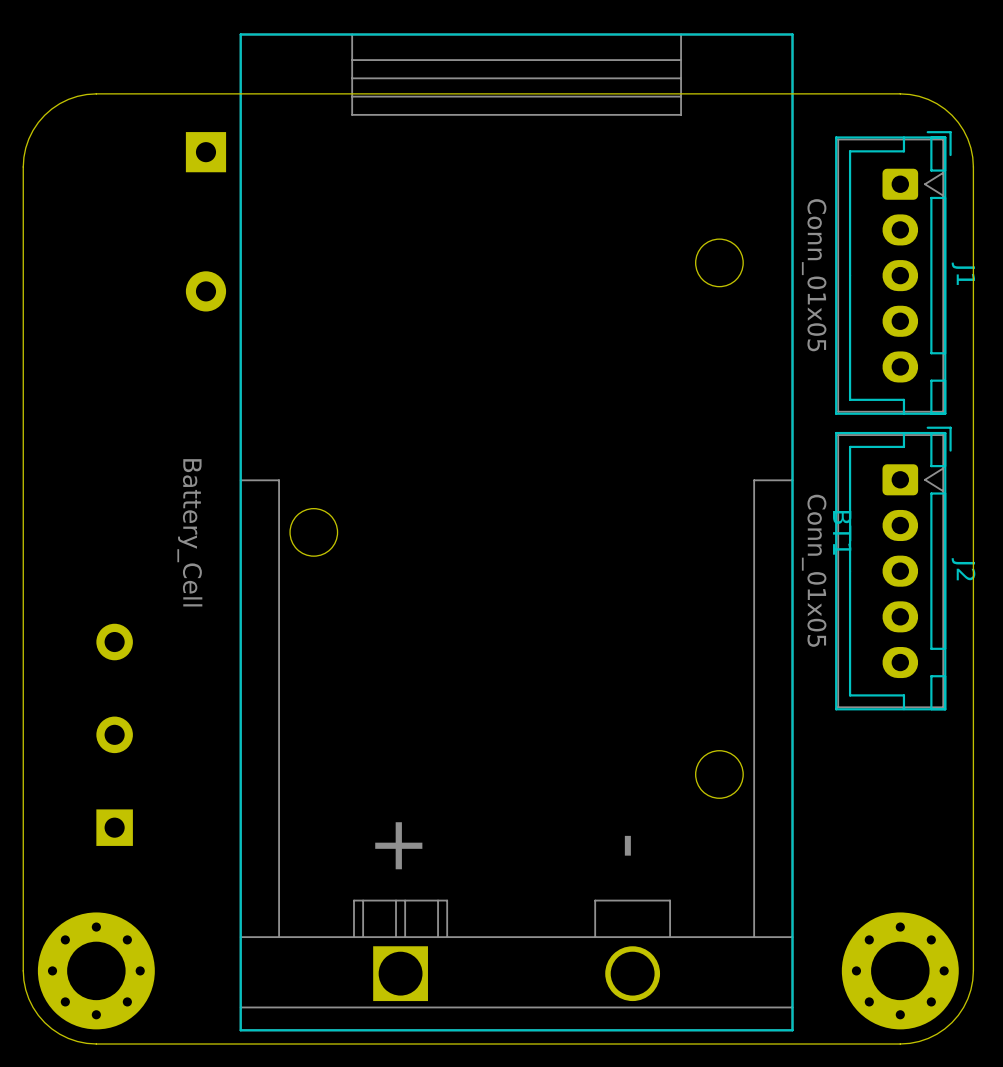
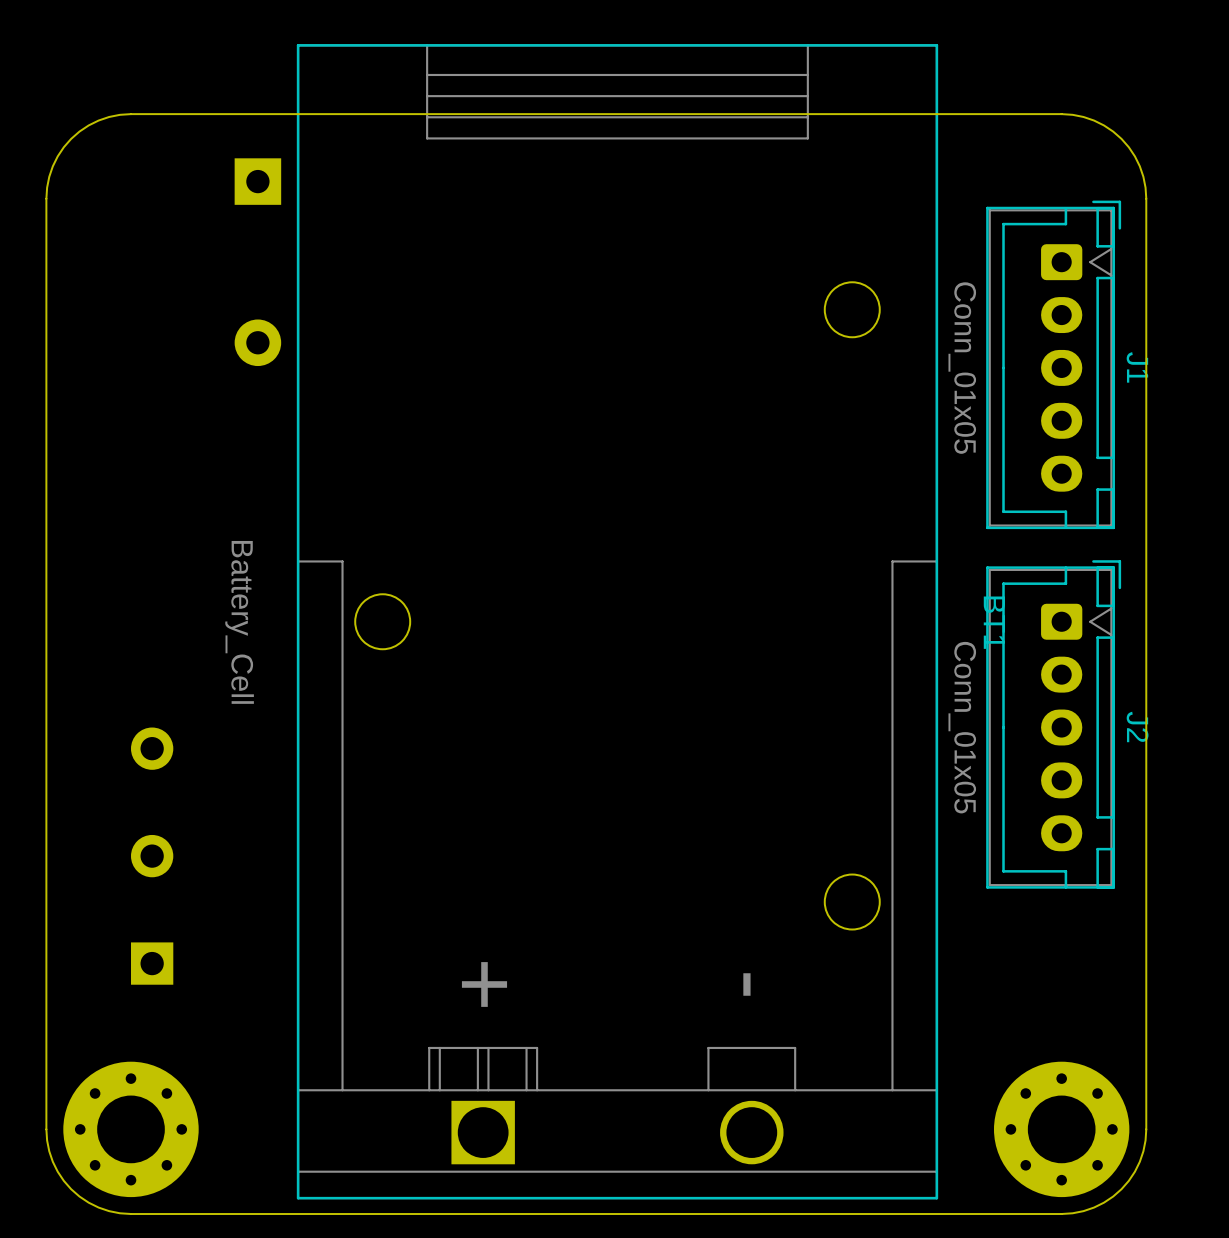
J1 position: (893, 272) -> (1053, 364)
J2 position: (893, 568) -> (1053, 724)

